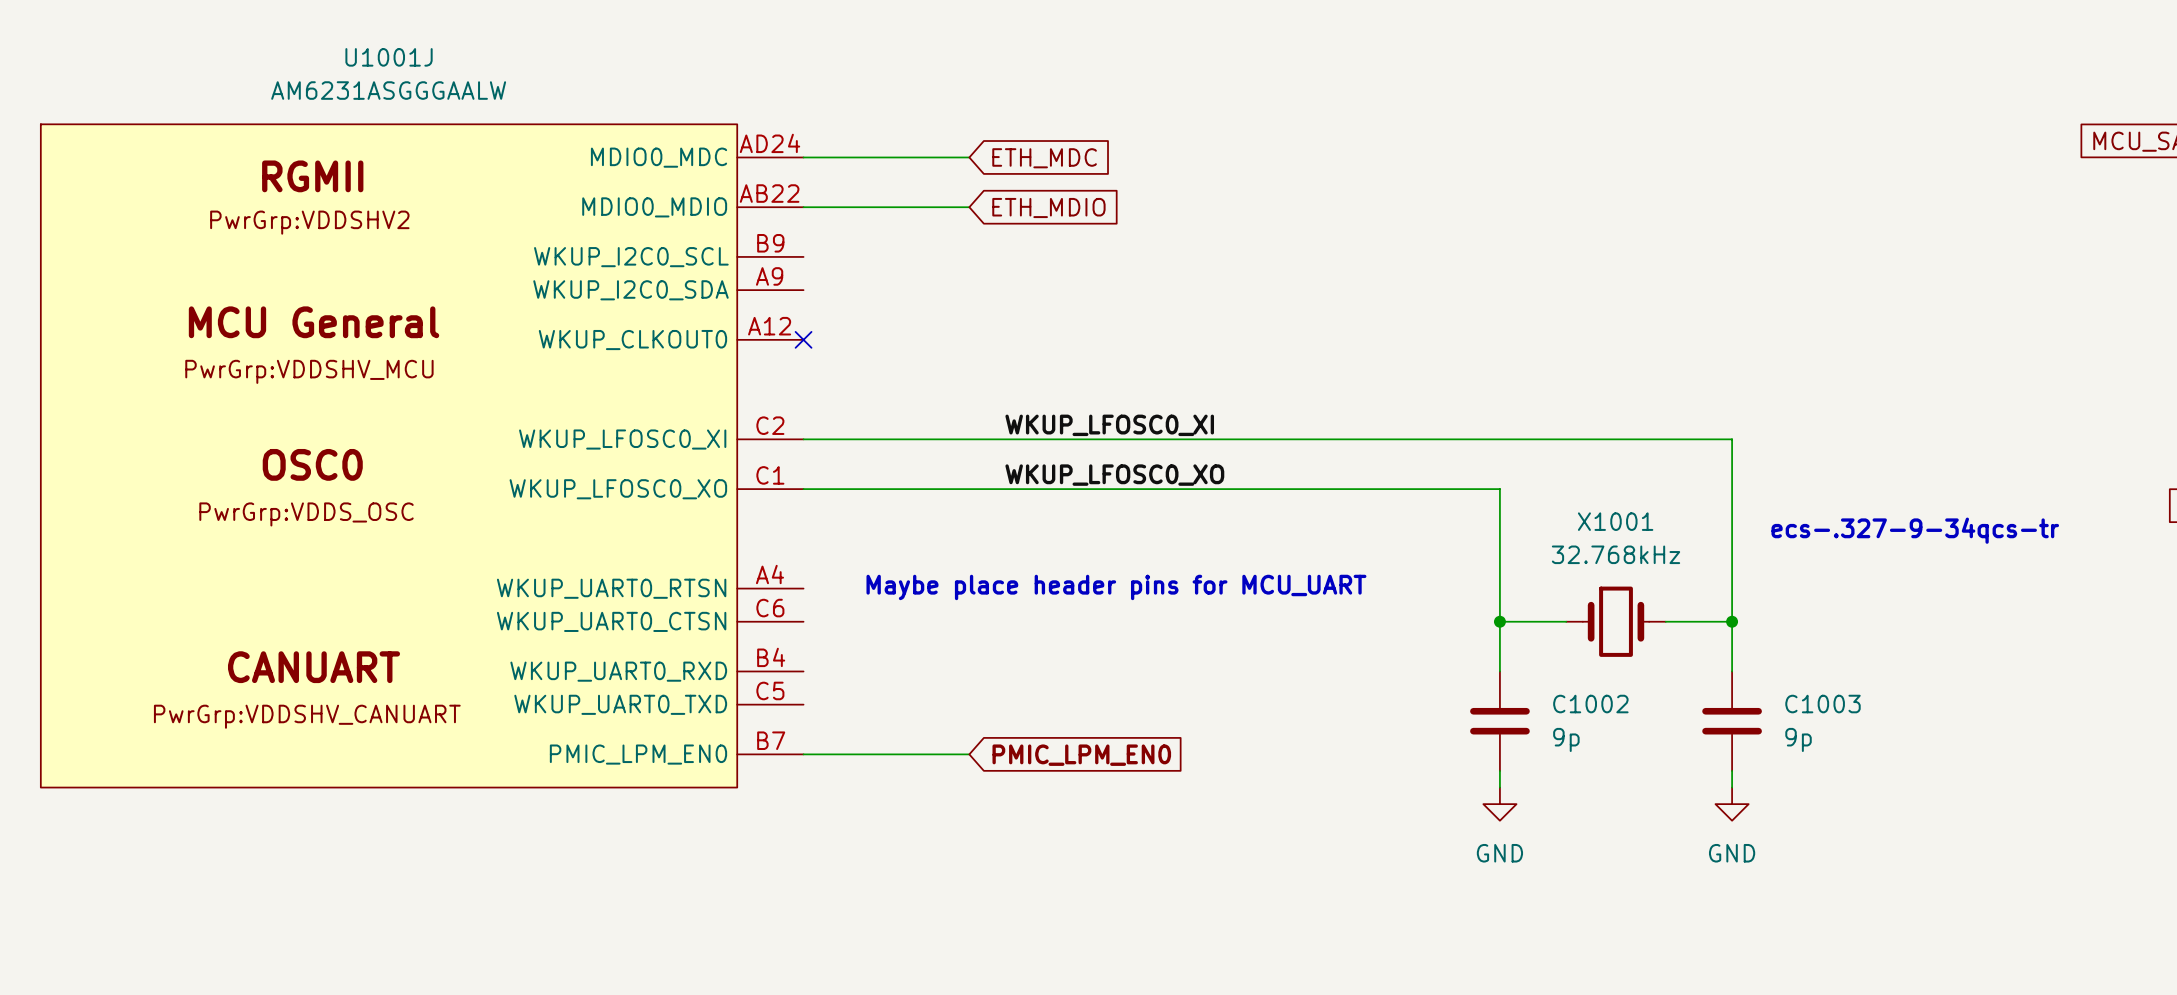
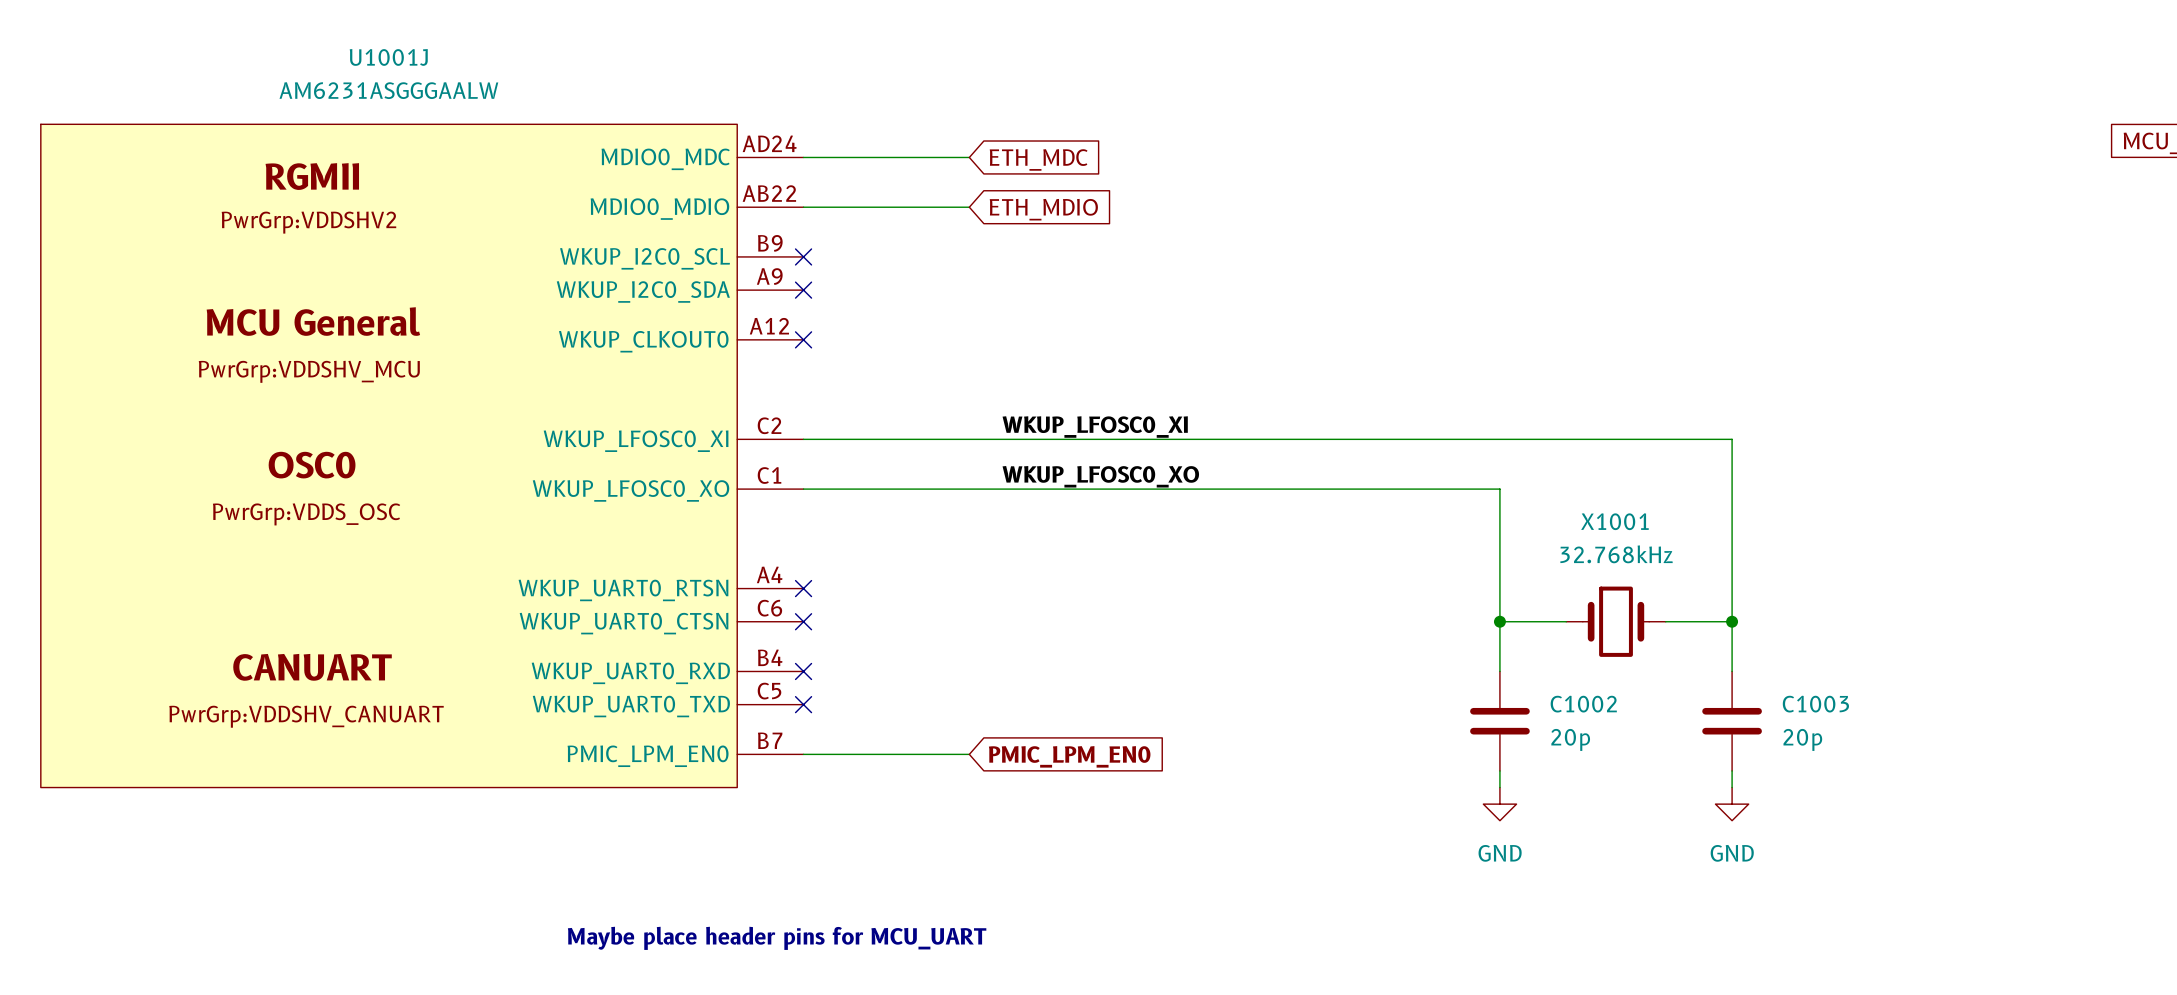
no-connect mark: none -> (803, 256)
no-connect mark: none -> (803, 290)
text: ecs-.327-9-34qcs-tr (1915, 530) -> none
text: Maybe place header pins for MCU_UART (1116, 587) -> none
no-connect mark: none -> (803, 588)
no-connect mark: none -> (803, 621)
no-connect mark: none -> (803, 671)
no-connect mark: none -> (803, 704)
C1002 value: 9p (1566, 739) -> 20p (1570, 739)
C1003 value: 9p (1798, 739) -> 20p (1802, 739)
text: none -> Maybe place header pins for MCU_UART (777, 938)

